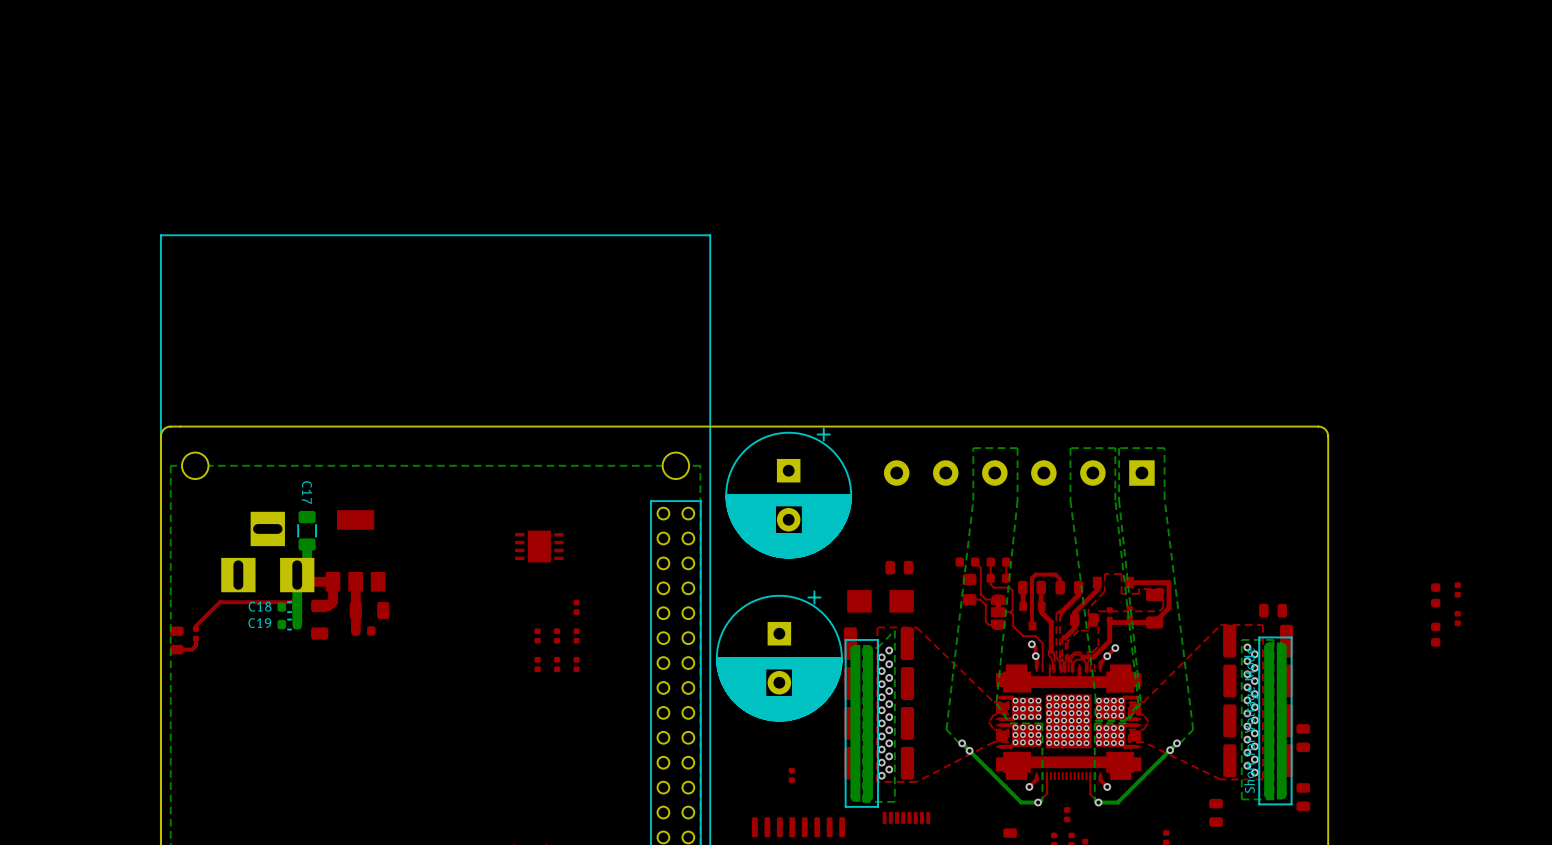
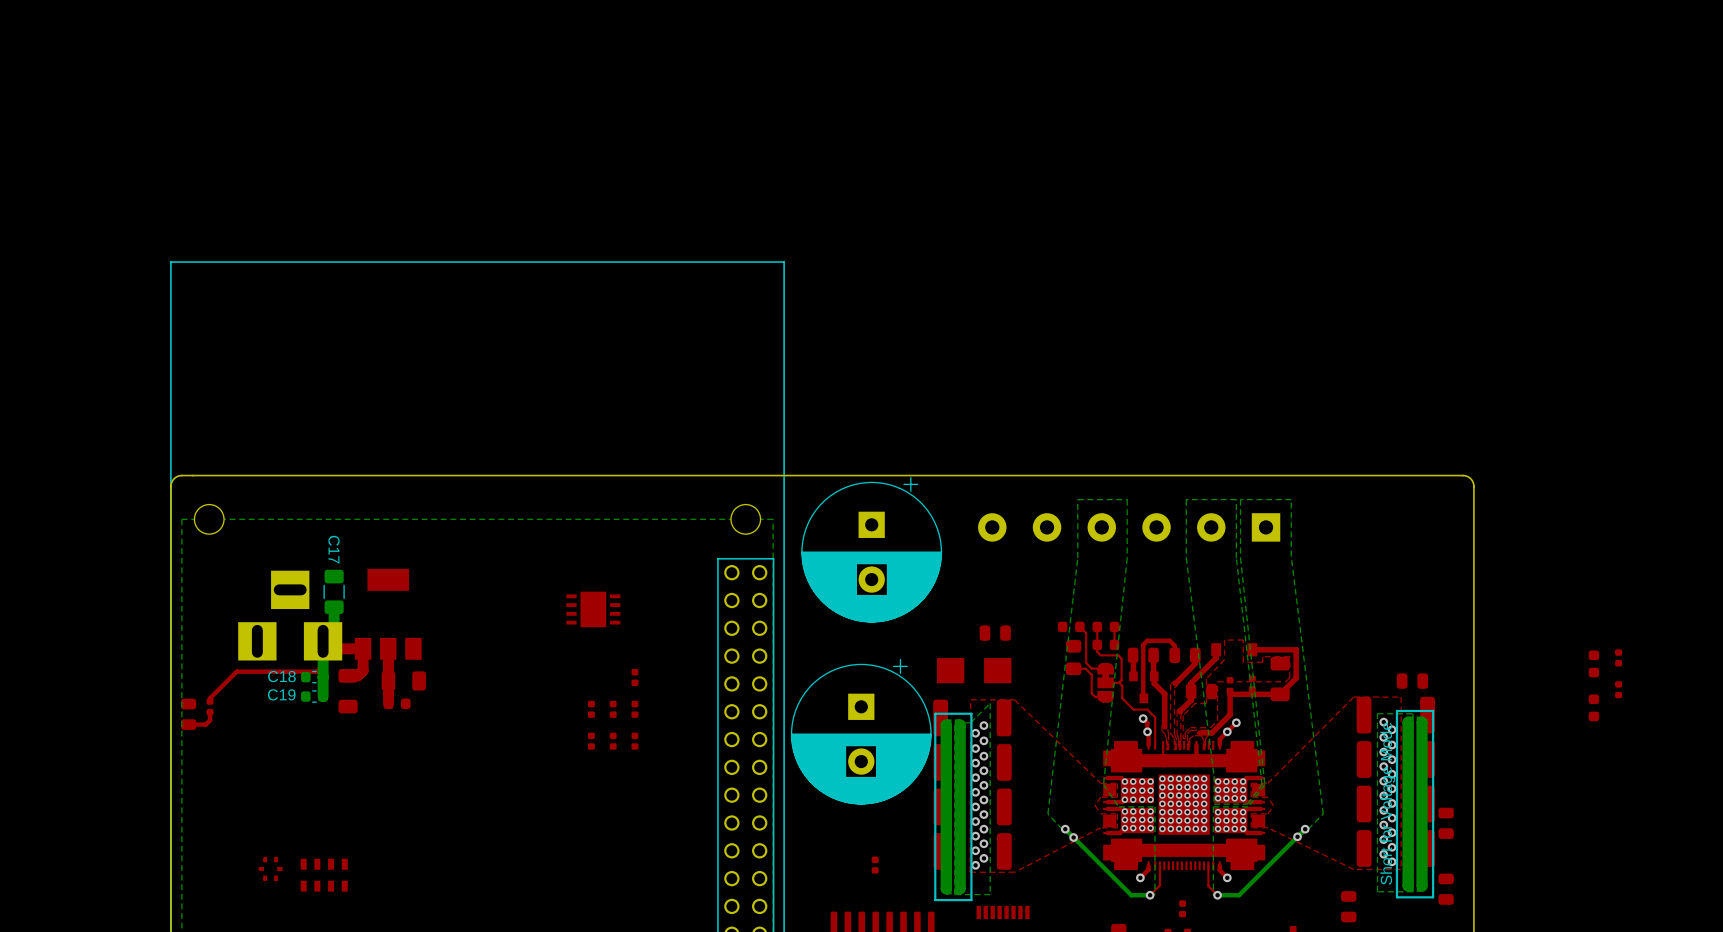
part: none -> (270, 868)
part: none -> (324, 875)

